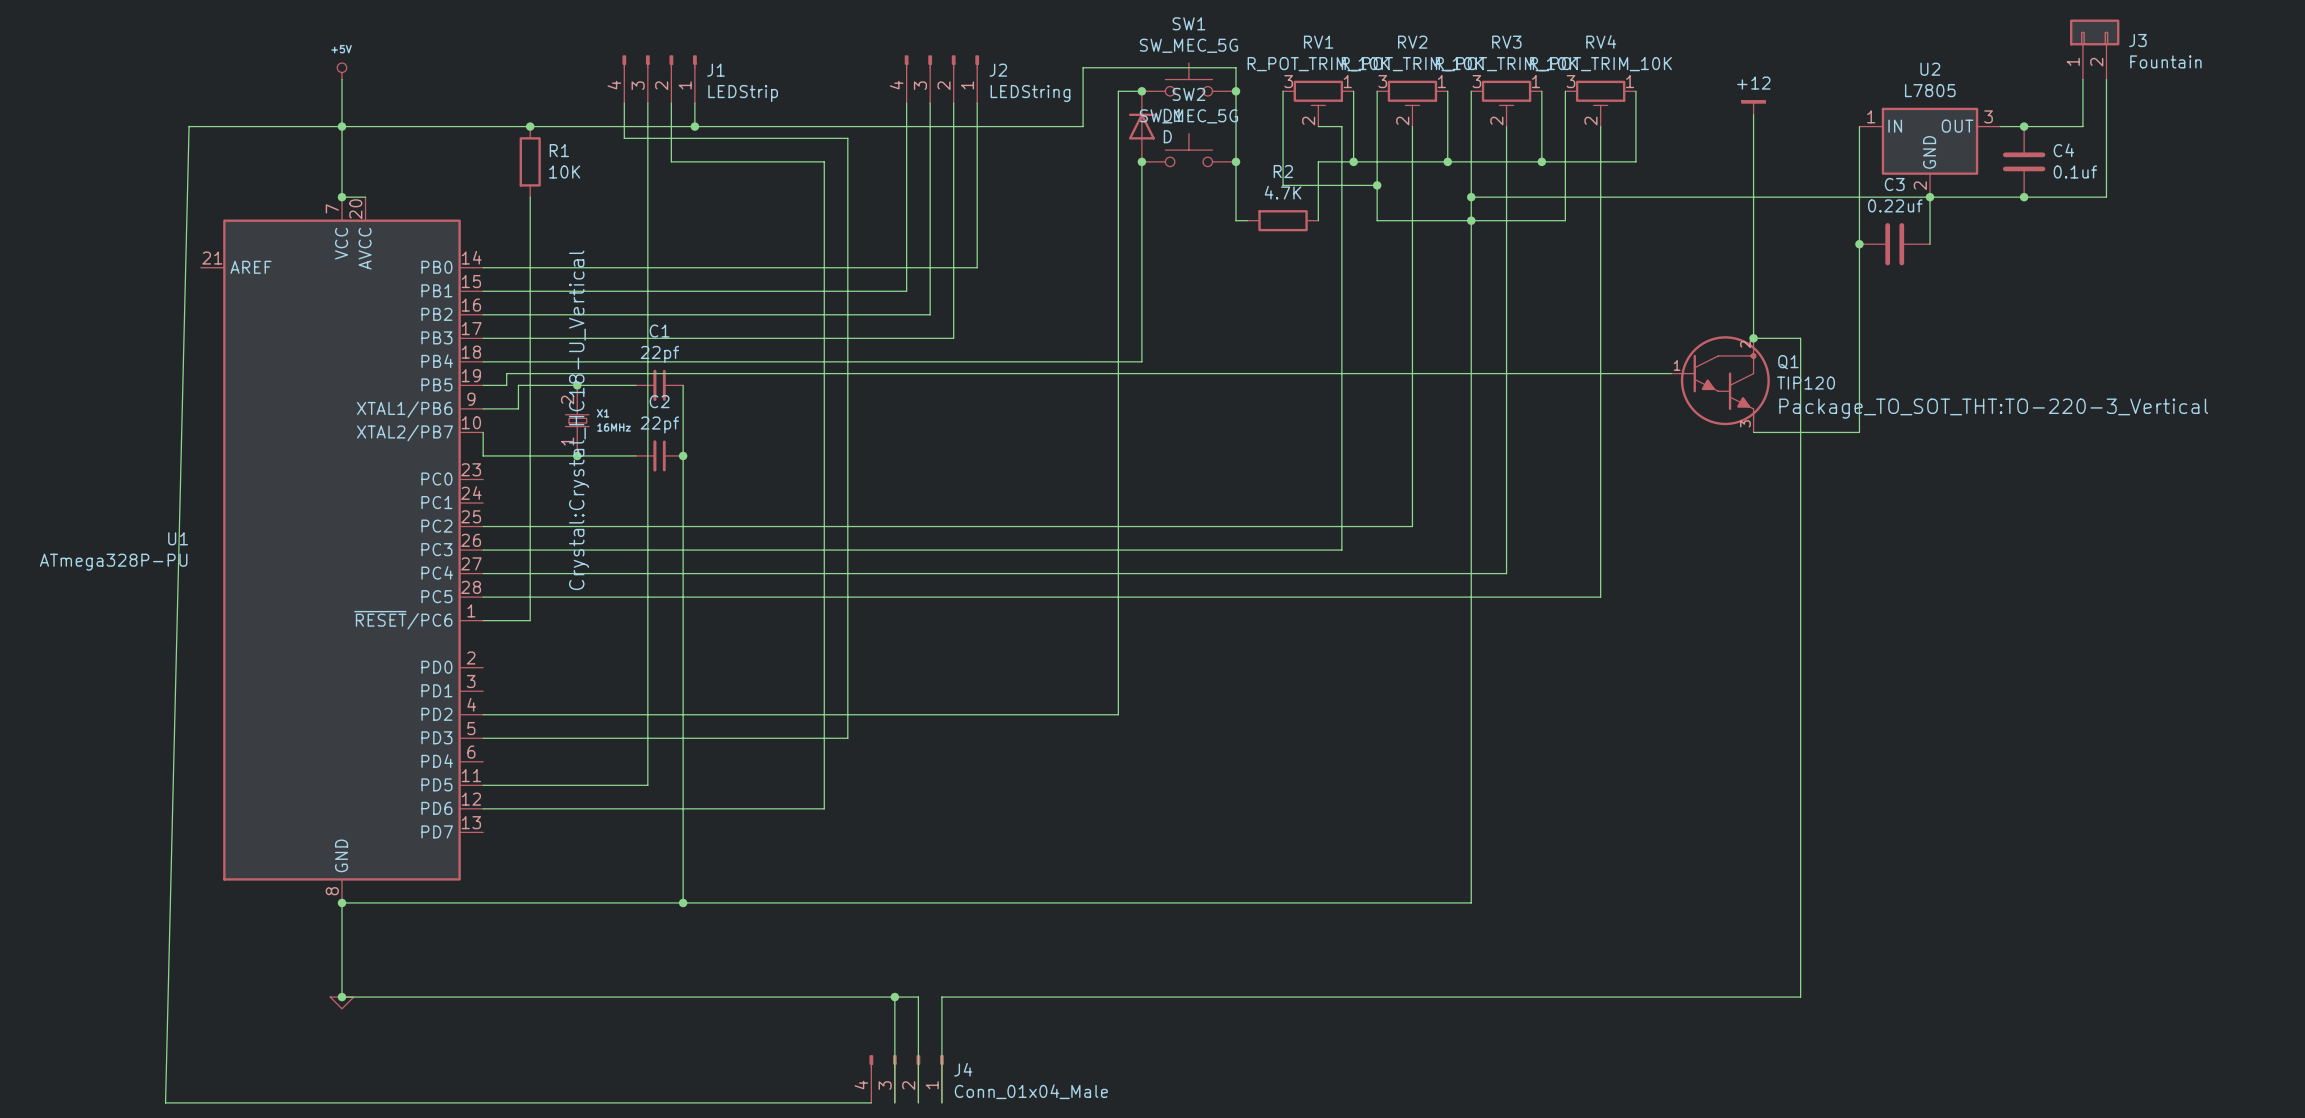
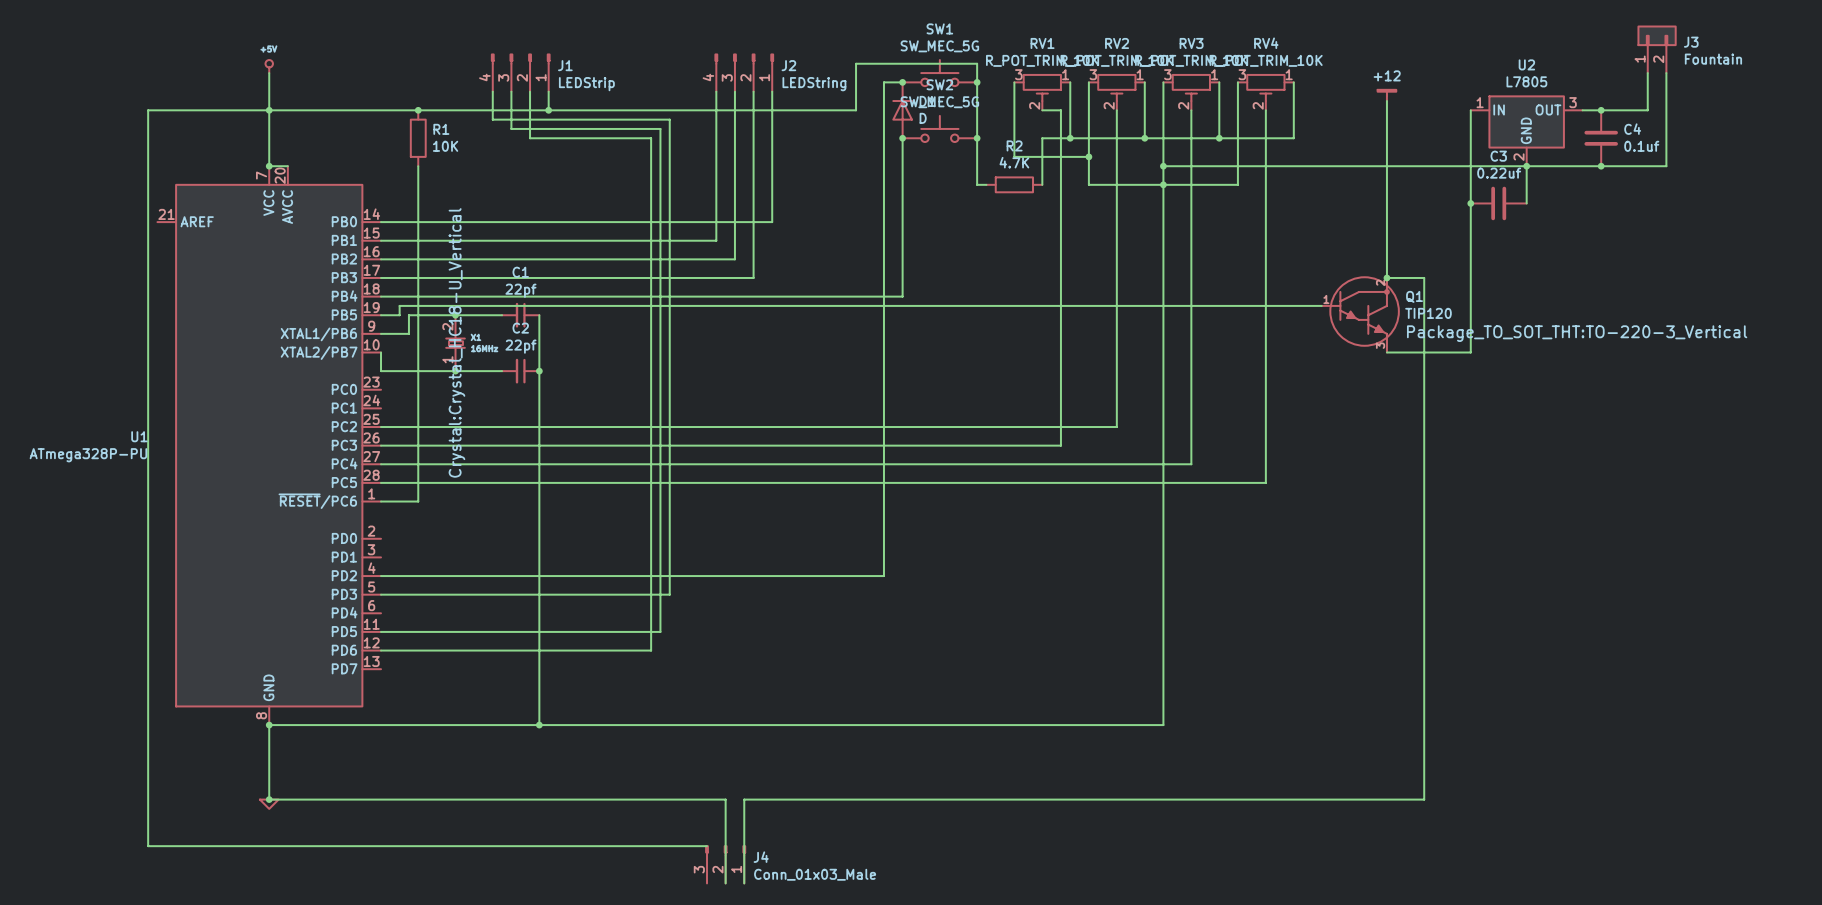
wire: (189, 126) (165, 1102) (871, 1102) -> (148, 110) (148, 846) (707, 846)
wire: (647, 150) (647, 785) -> (511, 128) (660, 128) (660, 631) (511, 631)
wire: (894, 997) (894, 1102) -> none
junction: (894, 997) -> none
J4 symbol: [869, 1055, 944, 1103] -> [705, 845, 746, 884]
J4 value: Conn_01x04_Male (1031, 1091) -> Conn_01x03_Male (815, 874)

